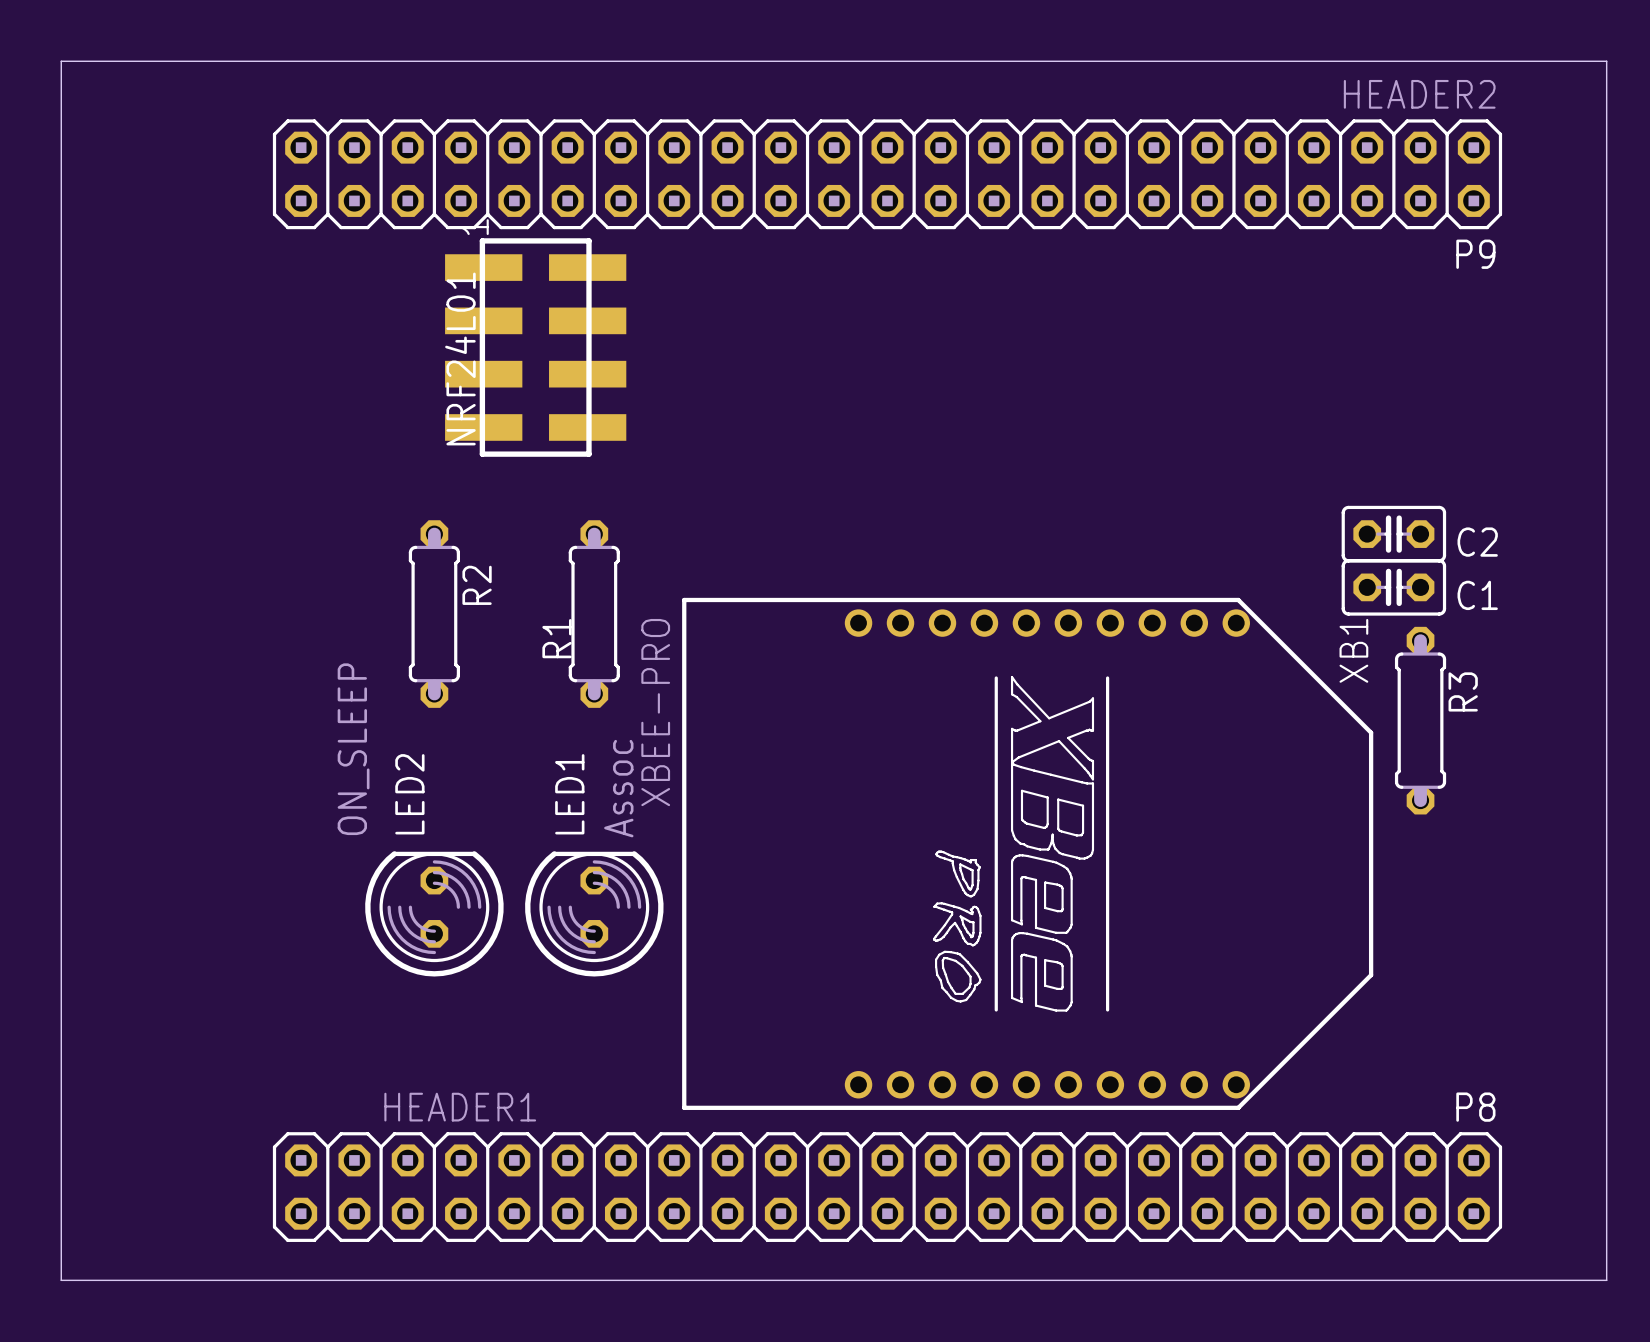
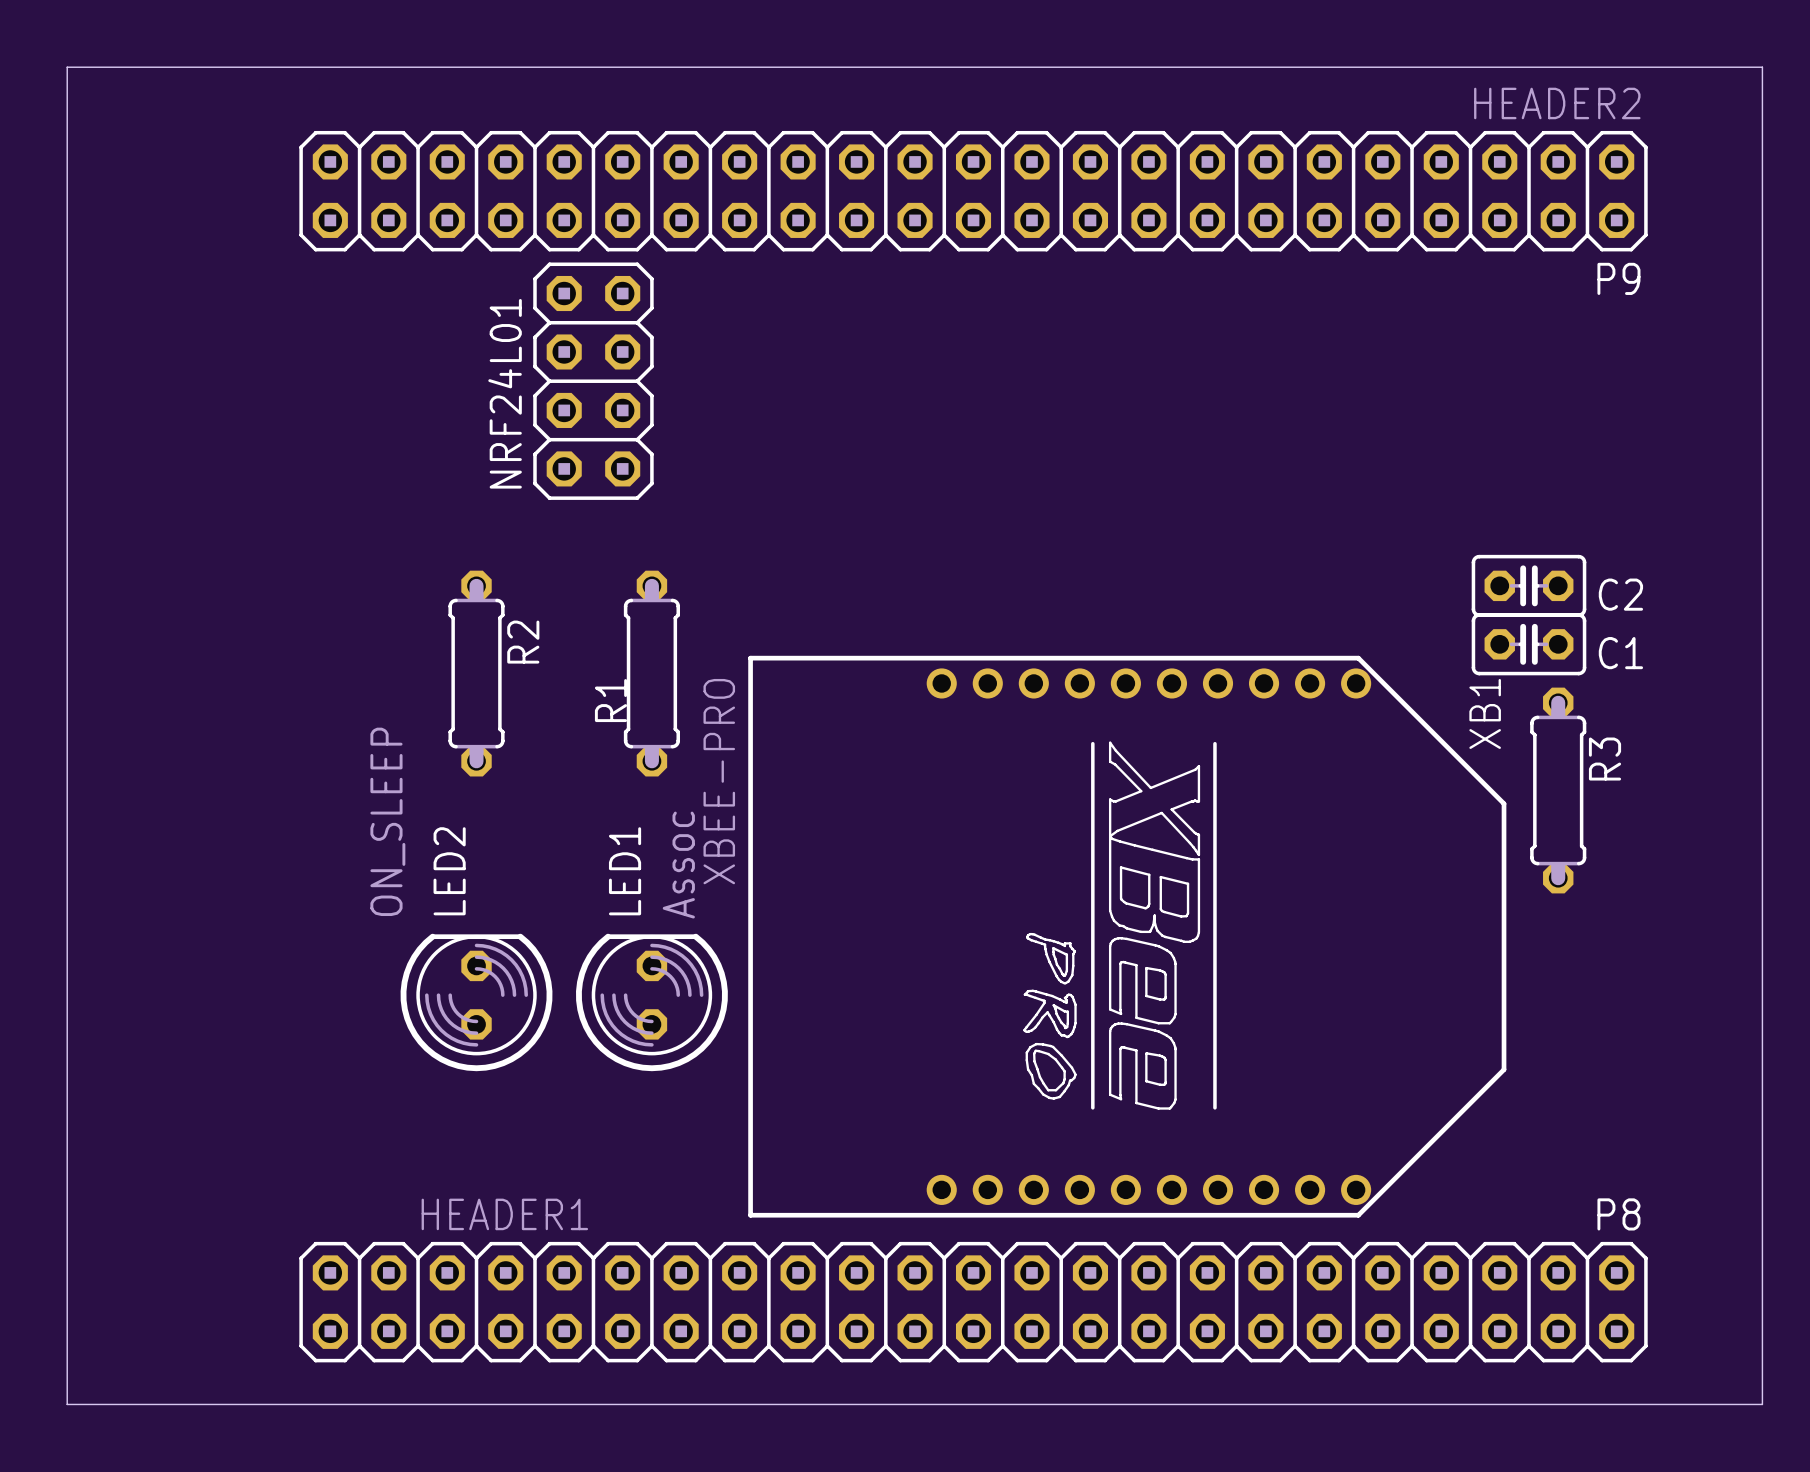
NRF24L01 footprint: [445, 238, 627, 457] -> [533, 262, 654, 500]

